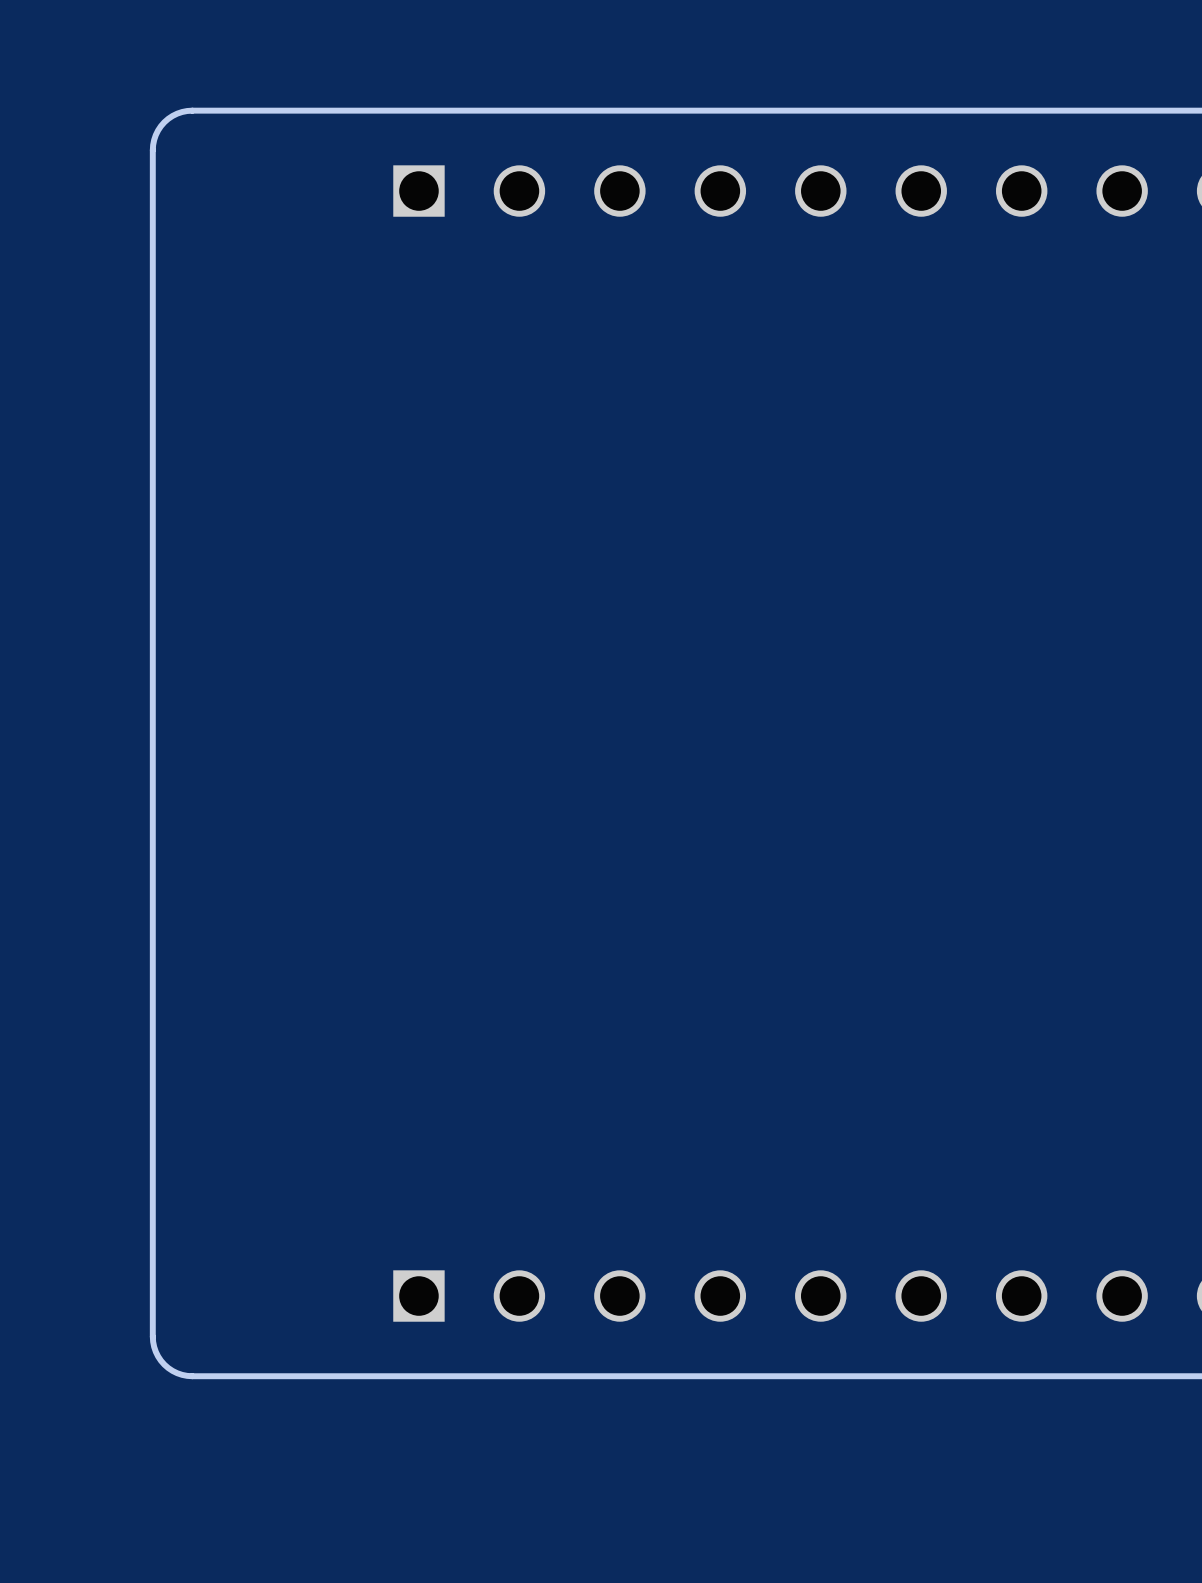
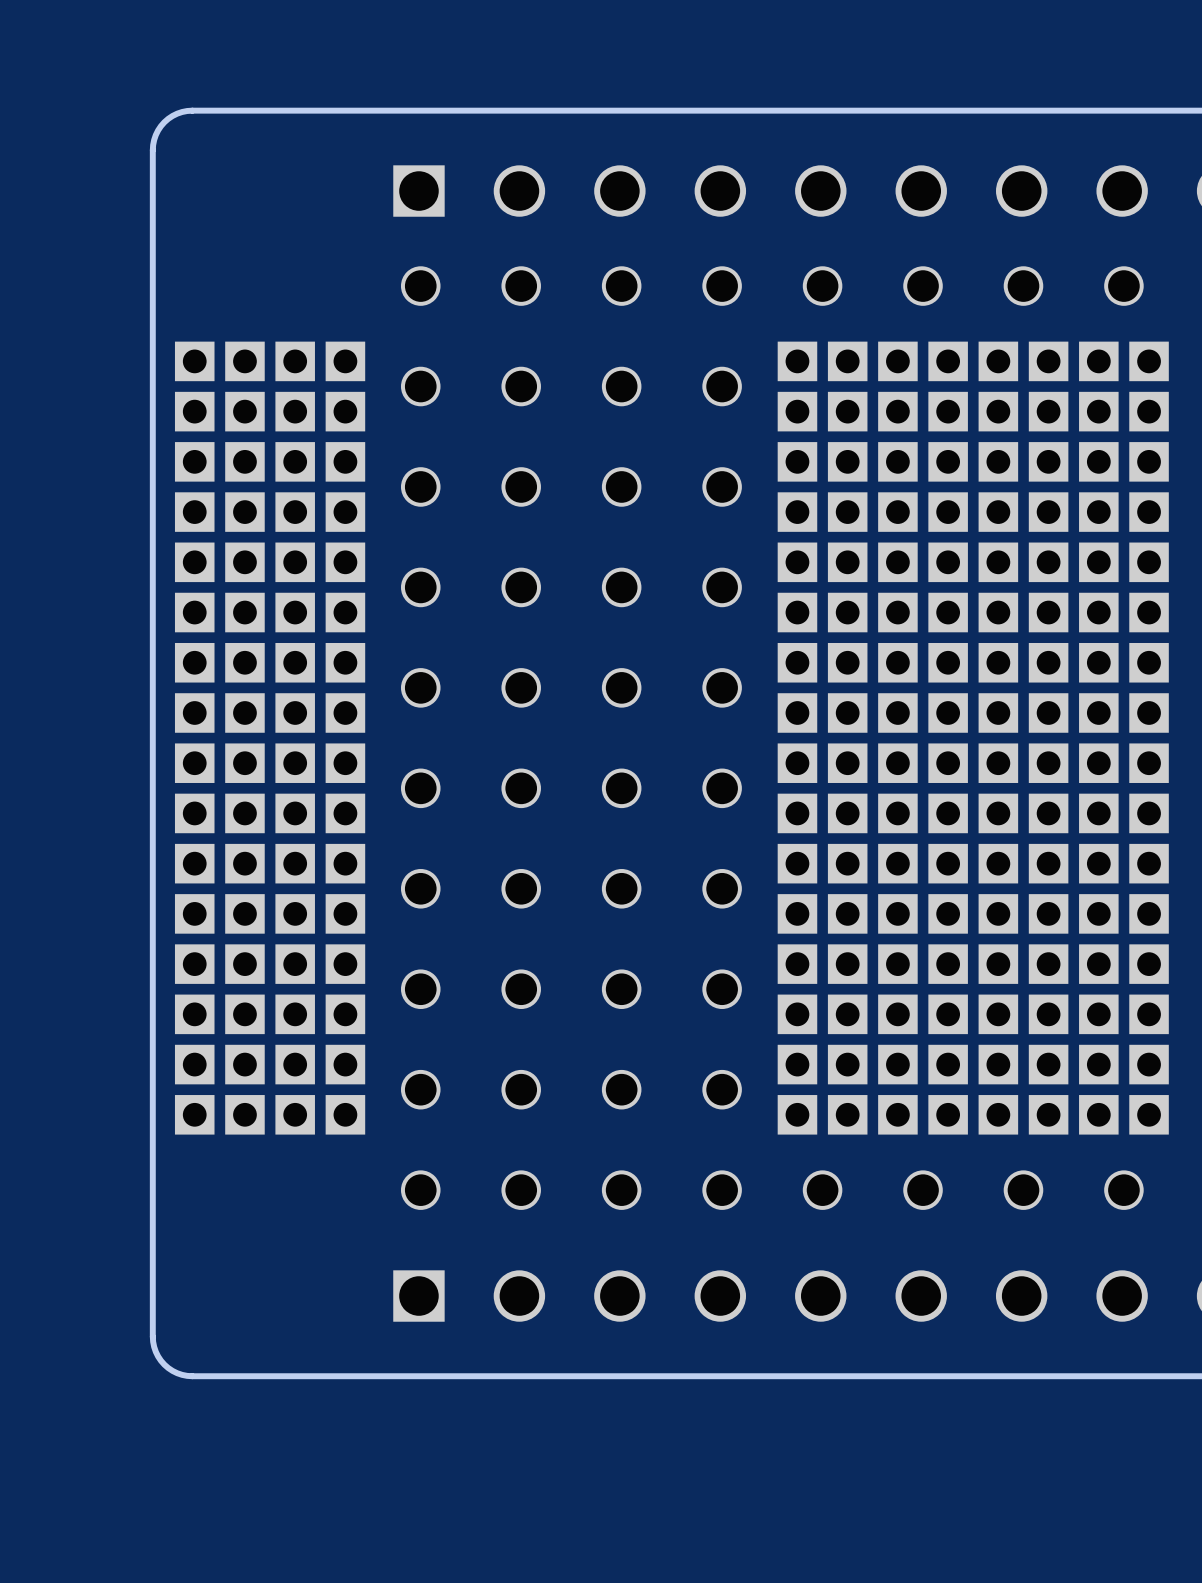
part: none -> (571, 286)
part: none -> (973, 286)
part: none -> (270, 436)
part: none -> (872, 436)
part: none -> (1073, 436)
part: none -> (571, 537)
part: none -> (270, 637)
part: none -> (872, 637)
part: none -> (1073, 637)
part: none -> (270, 838)
part: none -> (872, 838)
part: none -> (1073, 838)
part: none -> (571, 939)
part: none -> (270, 1039)
part: none -> (872, 1039)
part: none -> (1073, 1039)
part: none -> (571, 1190)
part: none -> (973, 1190)

